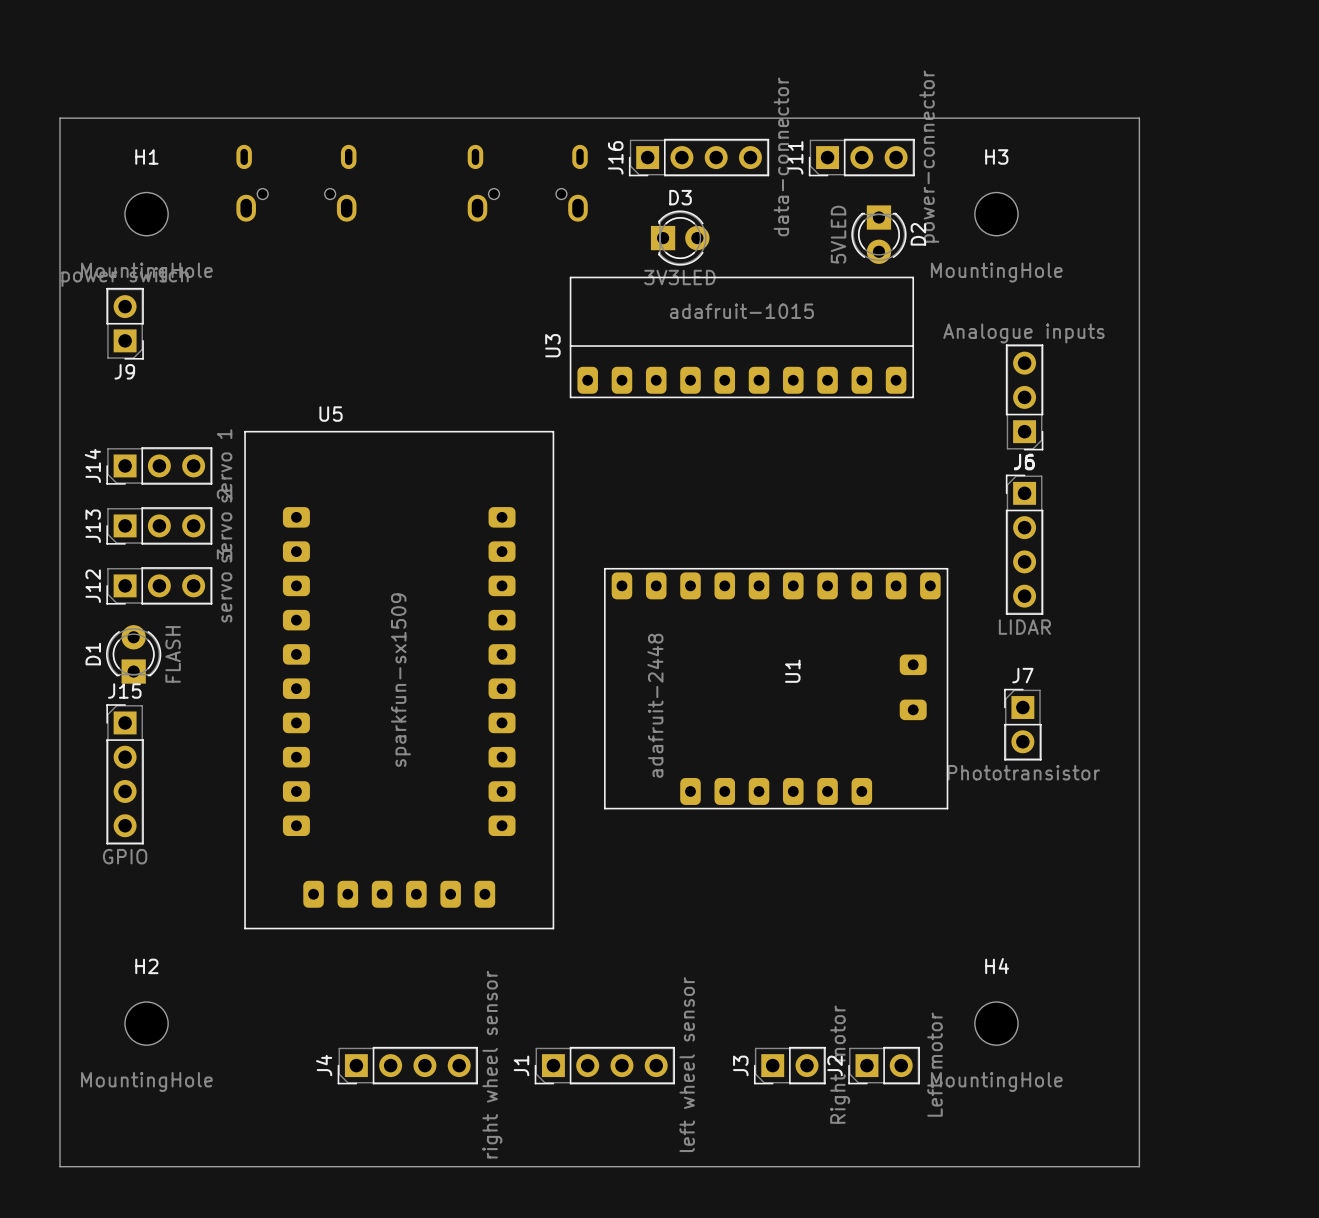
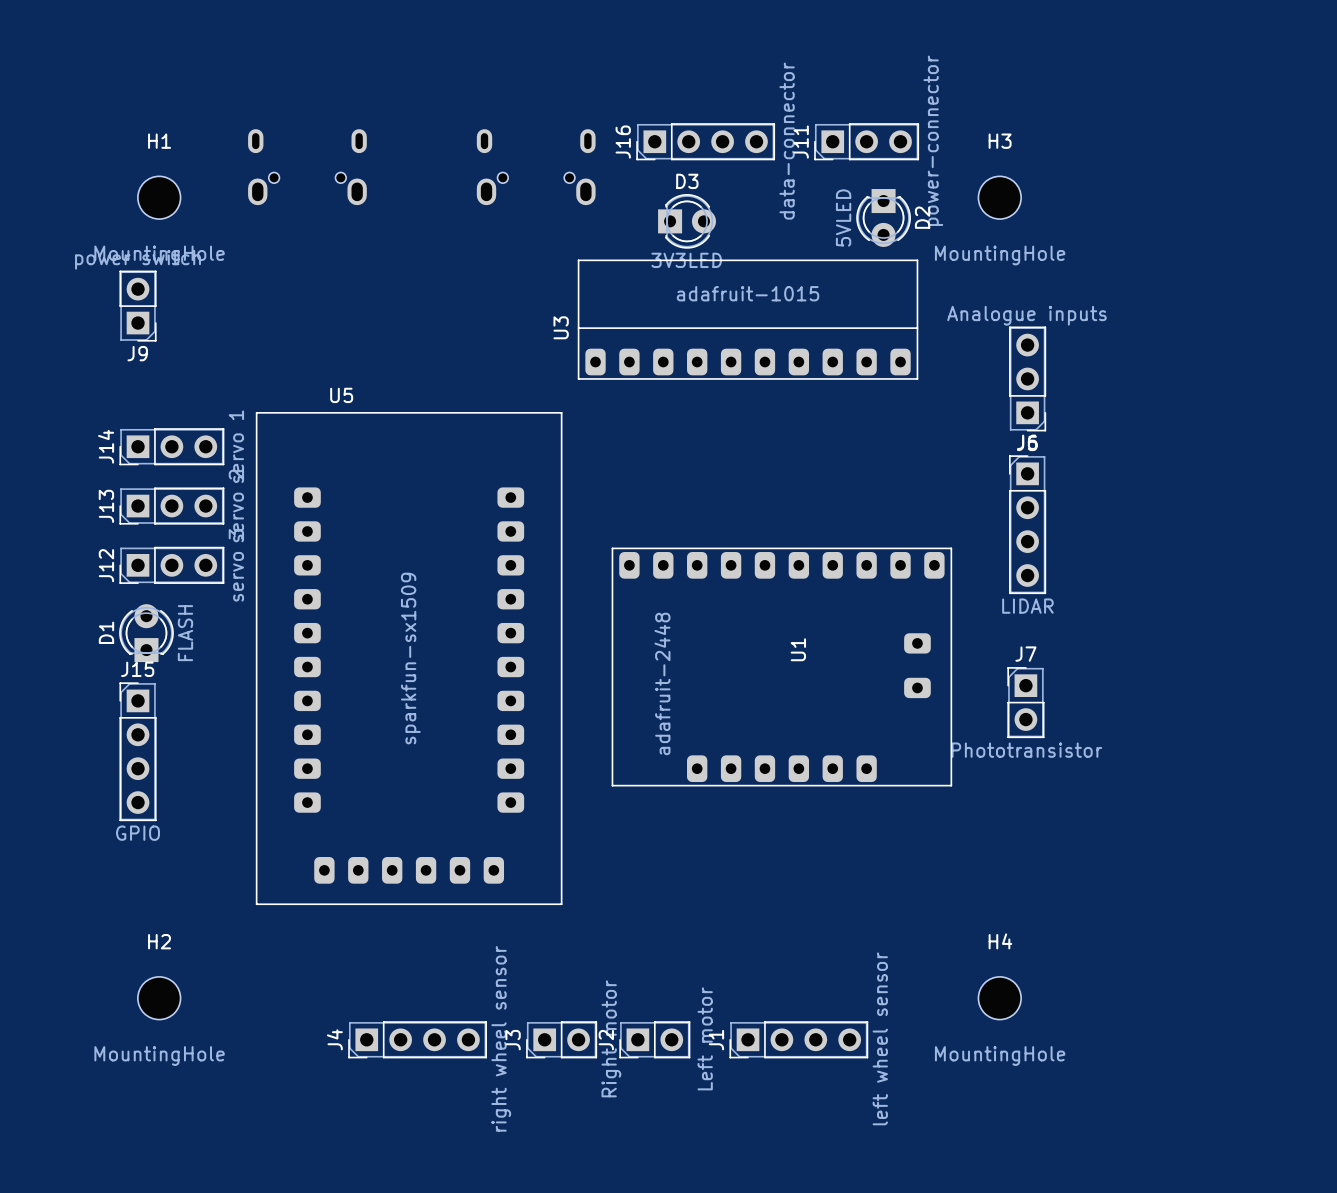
board edge: (60, 118) (60, 1166) (1139, 1166) (1139, 118) (60, 118) -> none
J1 position: (604, 1065) -> (798, 1039)
J3 position: (789, 1065) -> (561, 1039)
J2 position: (884, 1065) -> (654, 1039)

